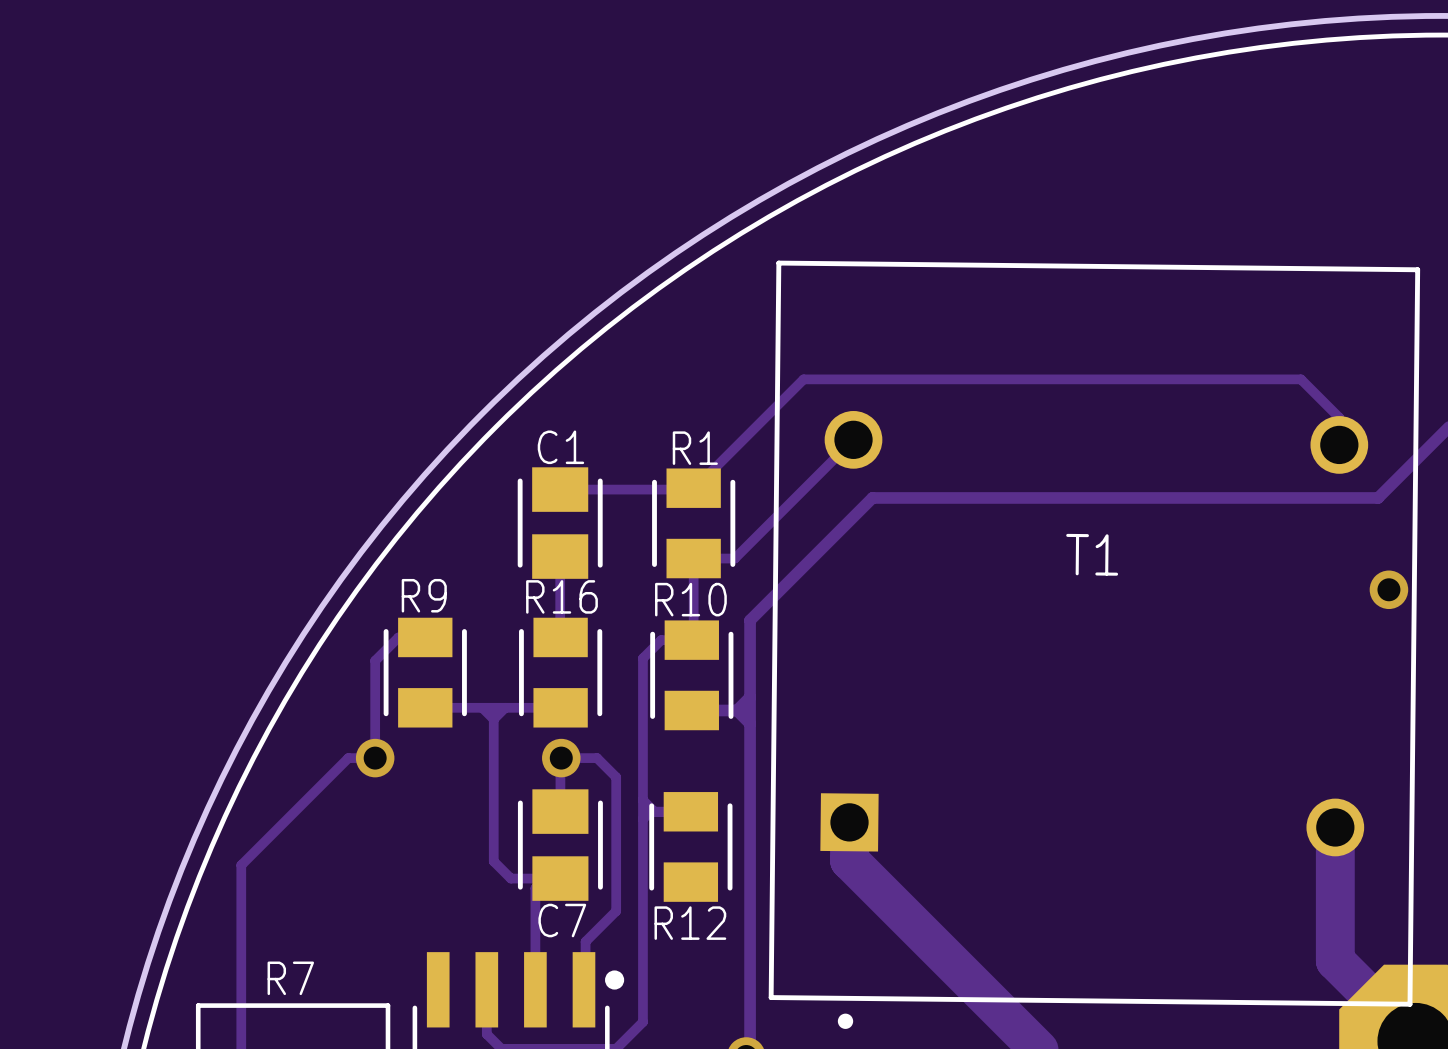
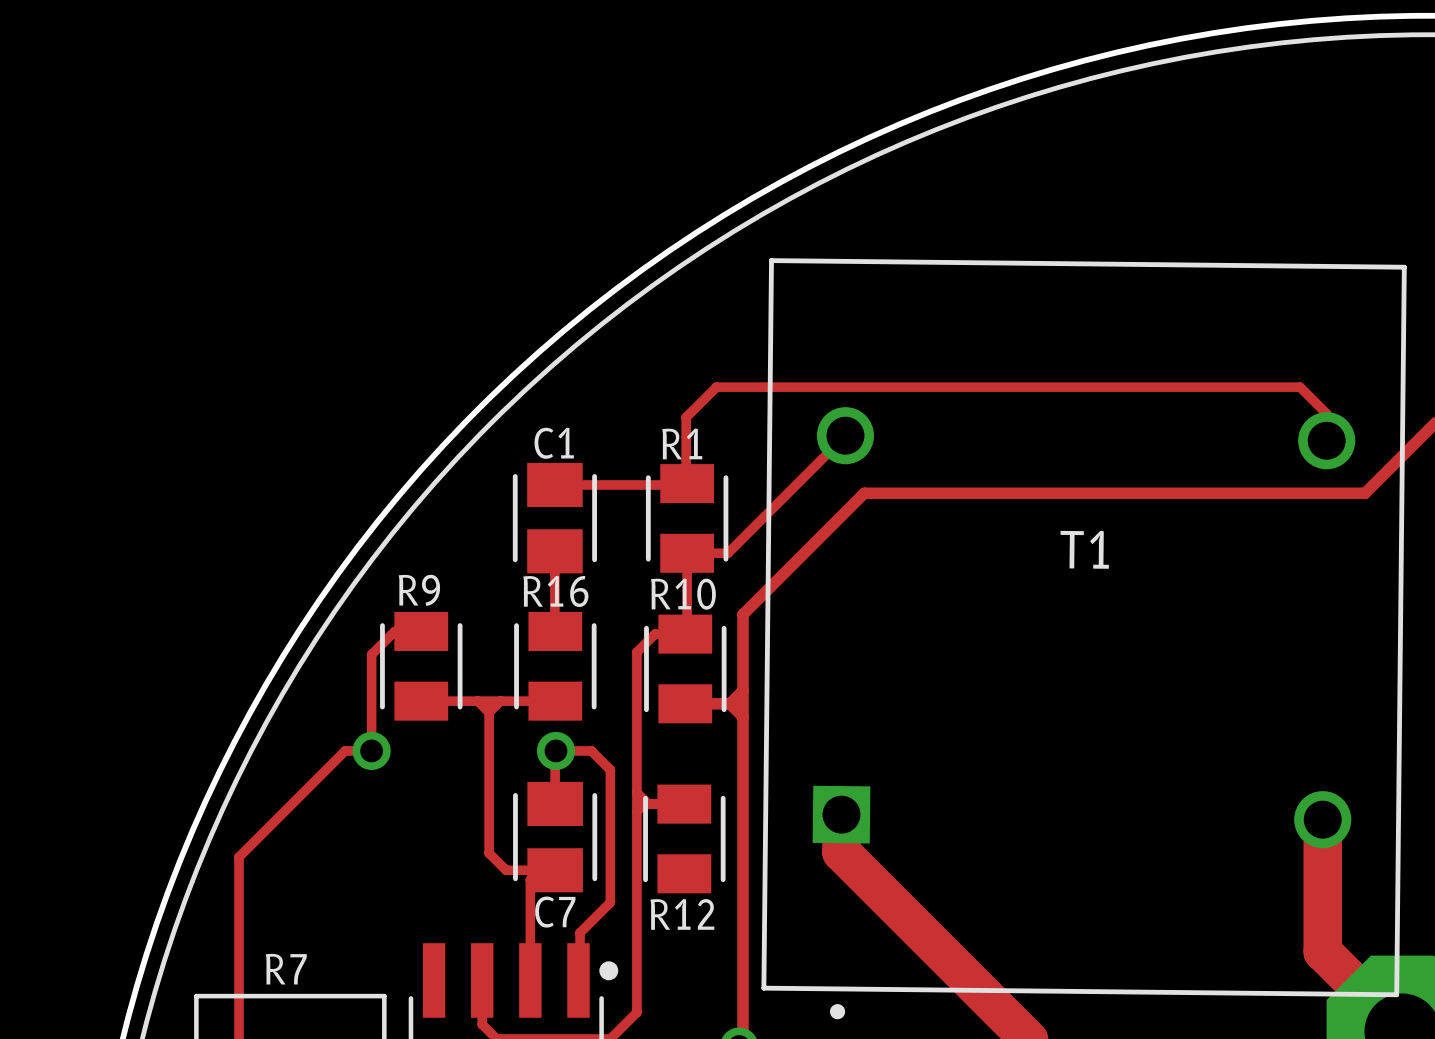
track: (1312, 390) (1300, 379) (803, 379) (693, 488) -> (1300, 387) (716, 387) (686, 417) (687, 483)
via: (1388, 589) -> none

